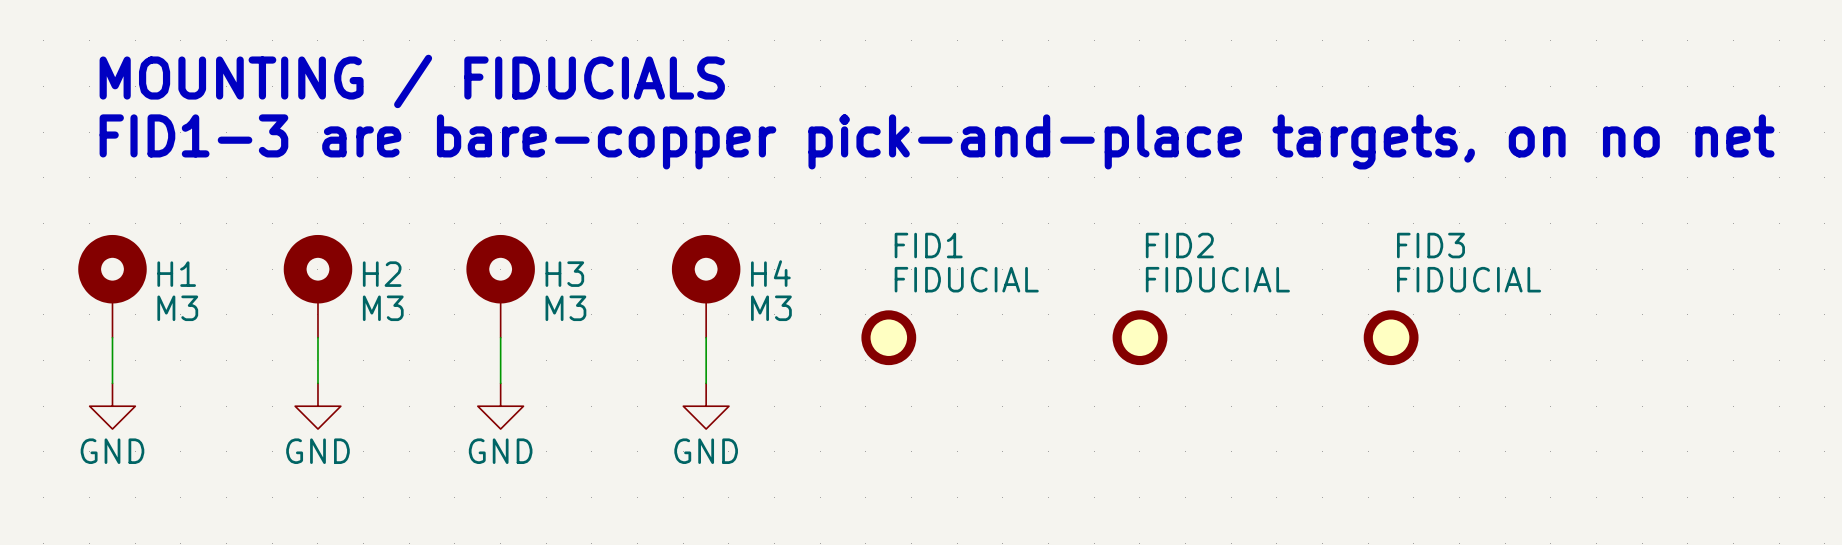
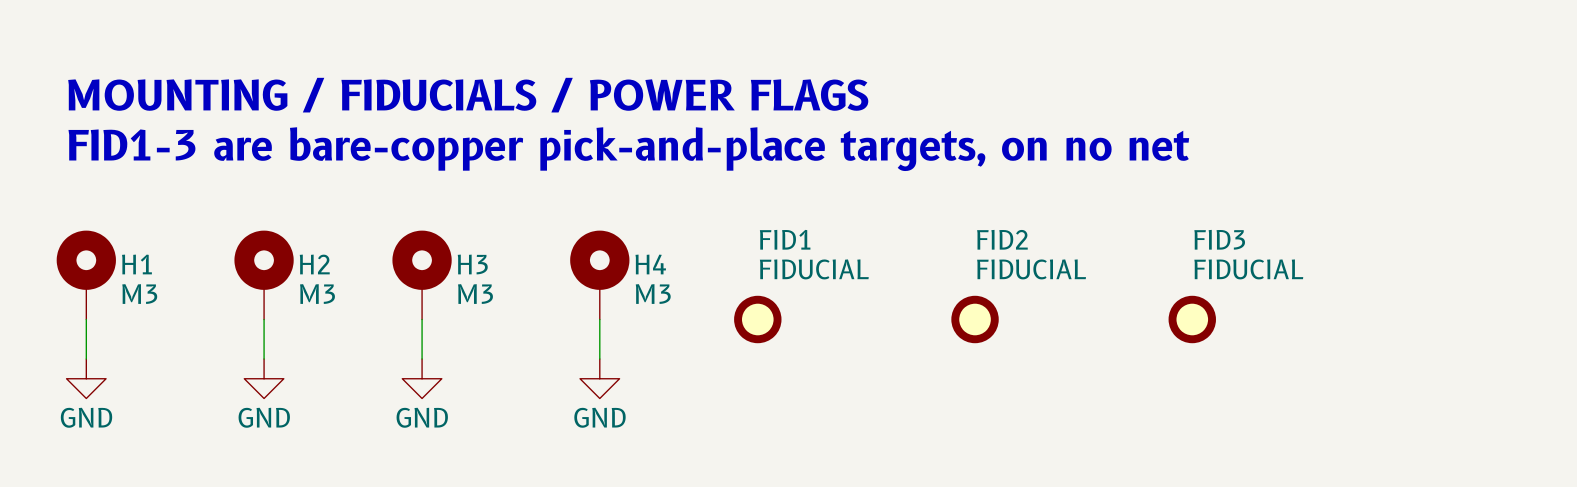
text: MOUNTING / FIDUCIALS (412, 81) -> MOUNTING / FIDUCIALS / POWER FLAGS (468, 95)

